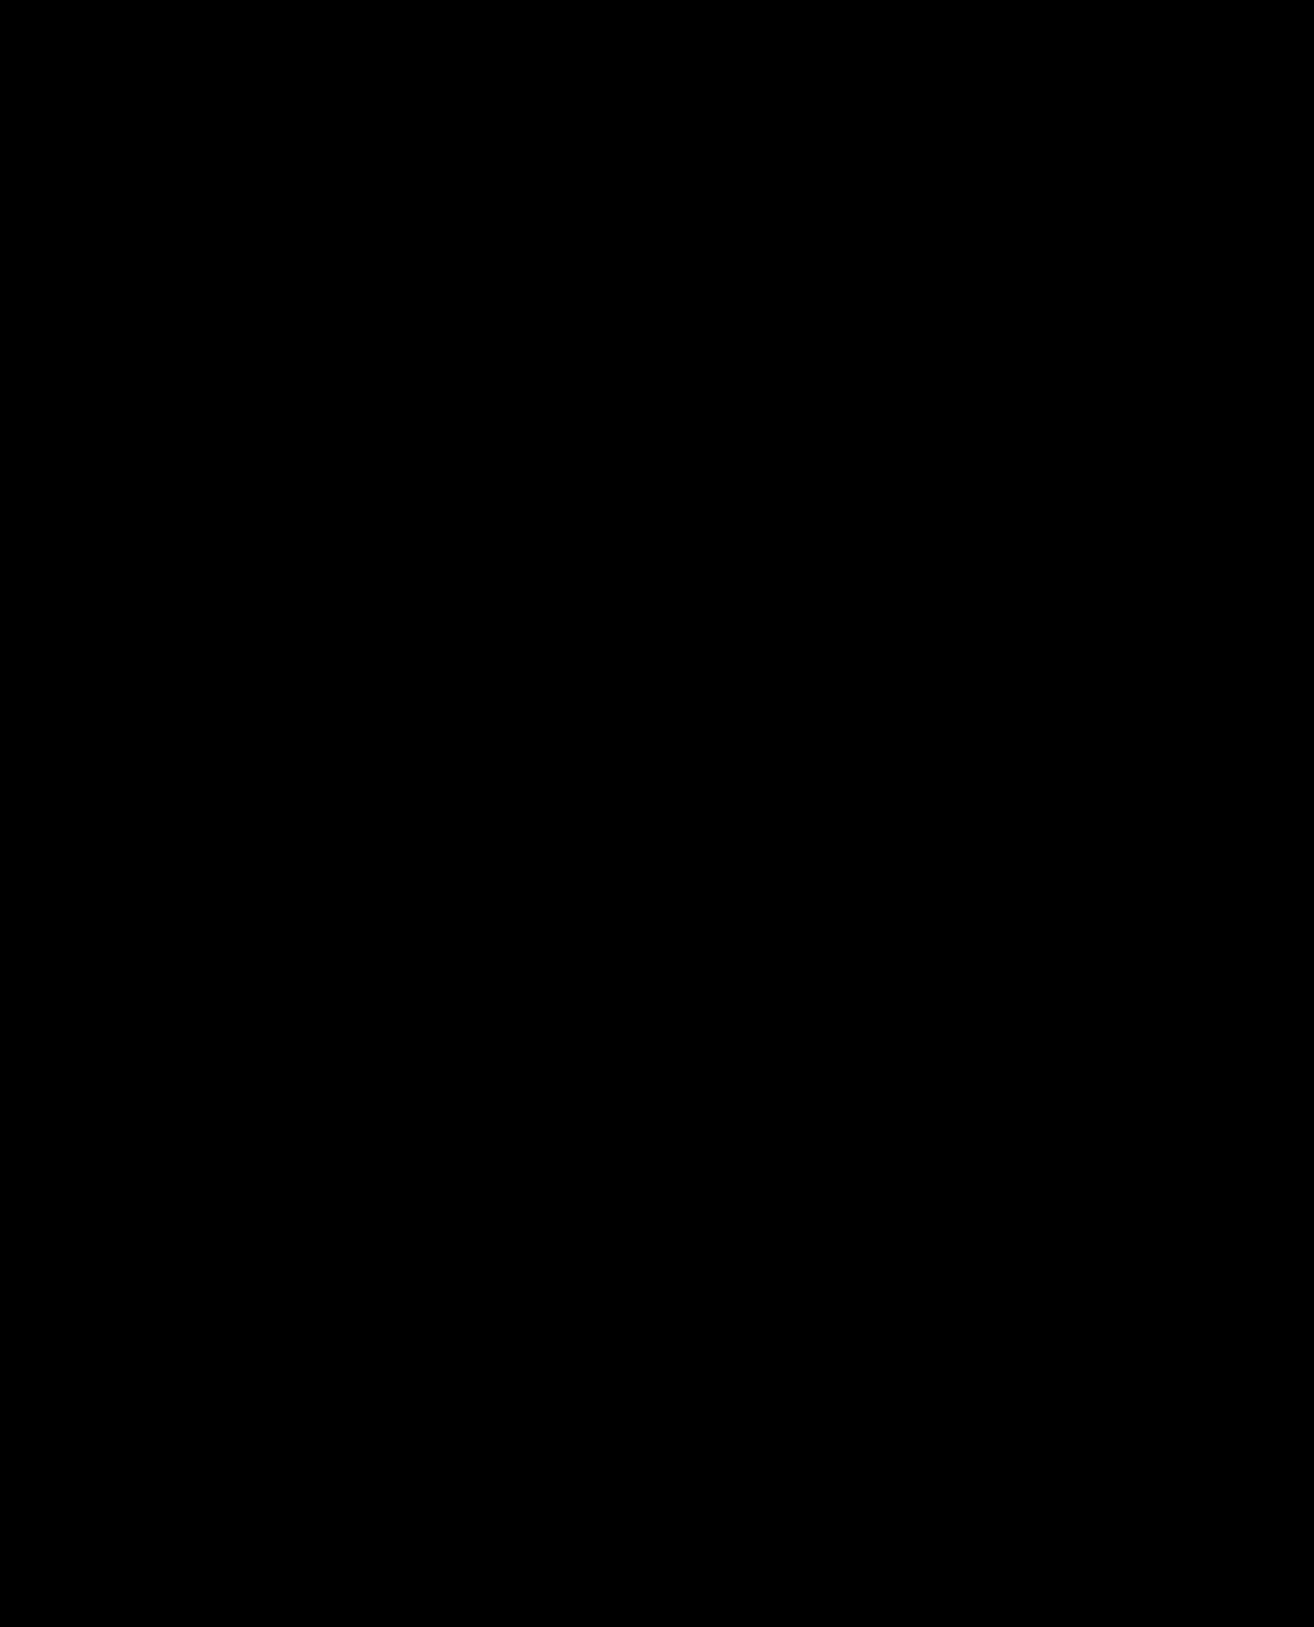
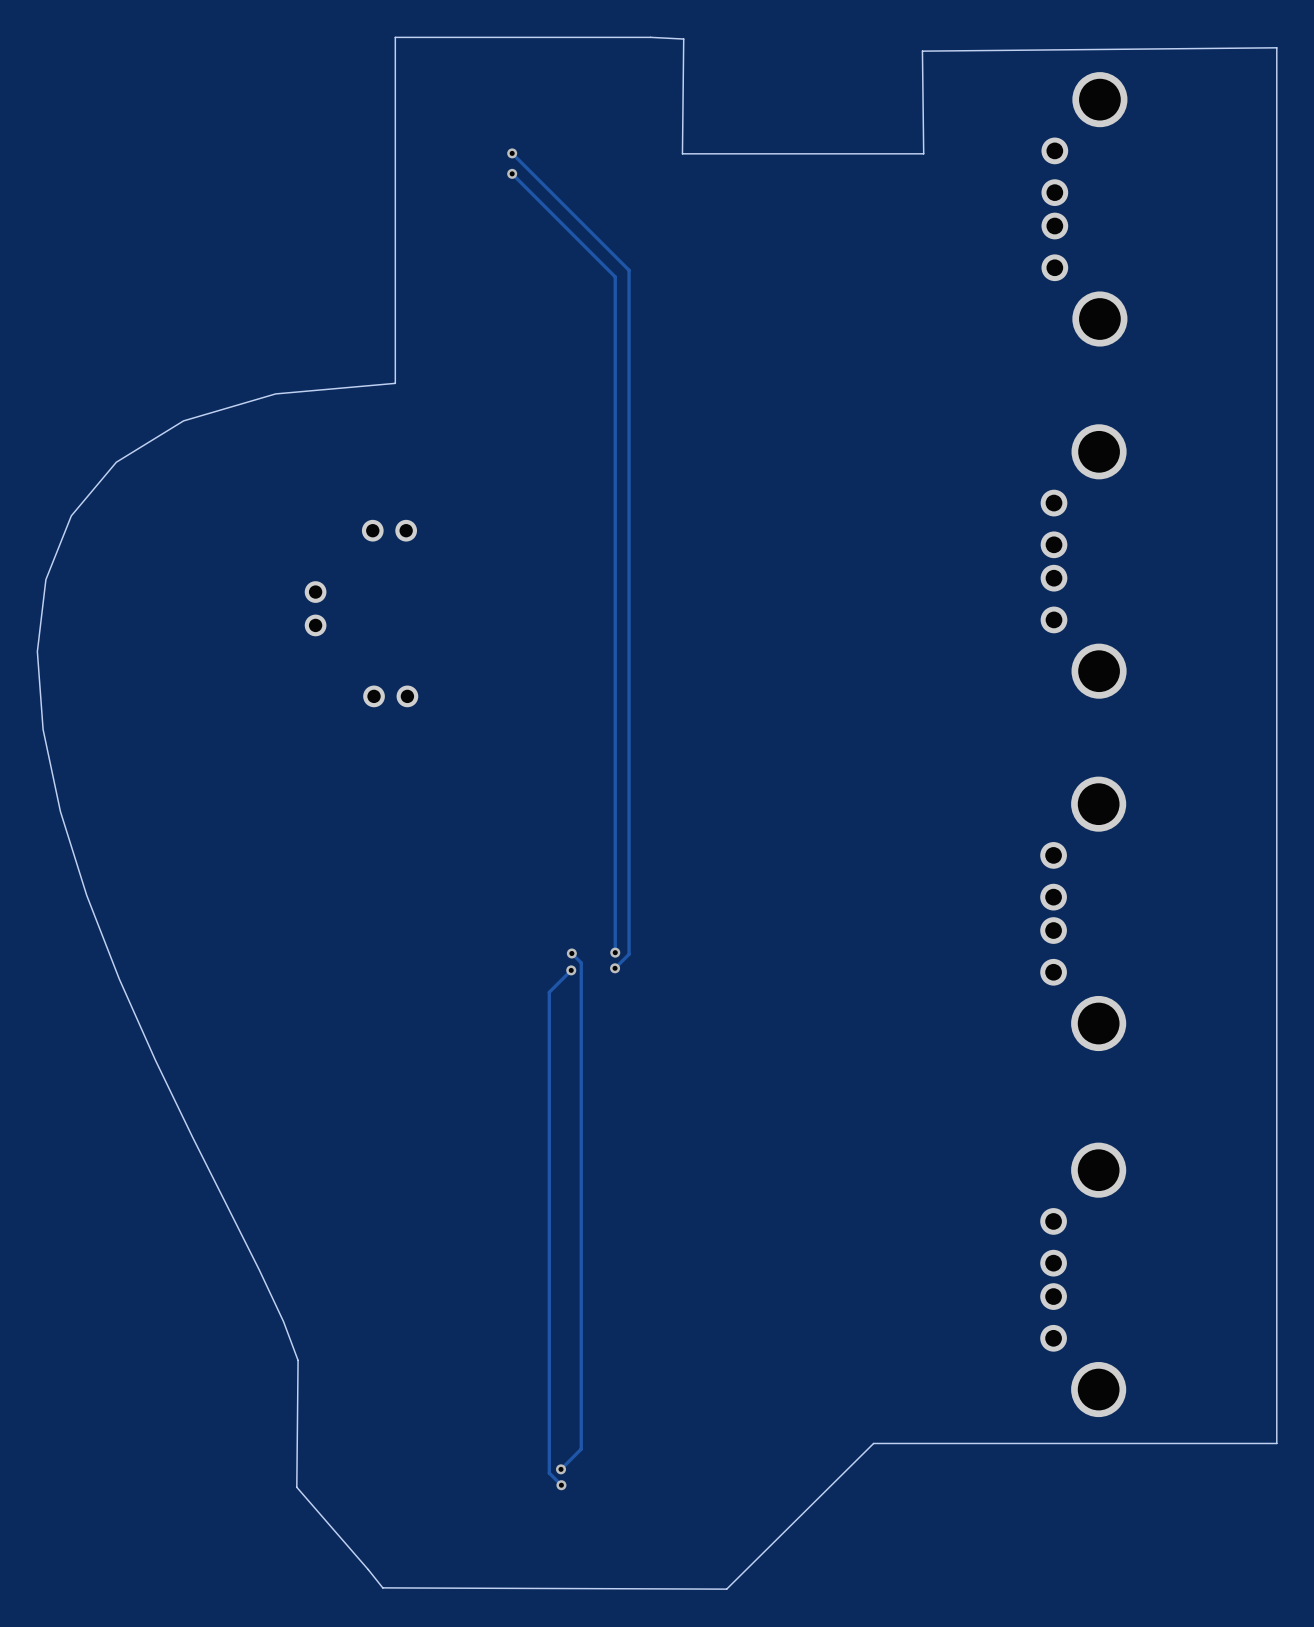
board edge: none -> (650, 37) (395, 37) (395, 383) (275, 393) (183, 420) (116, 462) (71, 515) (45, 579) (37, 651) (43, 729) (60, 811) (86, 895) (119, 978) (155, 1060) (259, 1270) (283, 1321) (298, 1360) (296, 1487) (382, 1587) (726, 1589) (873, 1443) (1276, 1443) (1276, 47) (922, 51) (923, 153) (682, 153) (683, 39) (650, 37)
track: none -> (512, 153) (629, 270) (629, 954) (615, 968)
via: none -> (512, 153)
track: none -> (512, 173) (615, 276) (615, 952)
via: none -> (512, 173)
part: none -> (1084, 209)
part: none -> (389, 530)
part: none -> (1083, 561)
part: none -> (315, 608)
part: none -> (390, 696)
part: none -> (1083, 913)
via: none -> (615, 952)
track: none -> (571, 953) (581, 962) (581, 1449) (561, 1469)
via: none -> (571, 953)
via: none -> (615, 968)
track: none -> (571, 970) (549, 992) (549, 1473) (561, 1485)
via: none -> (571, 970)
part: none -> (1083, 1279)
via: none -> (561, 1469)
via: none -> (561, 1485)

